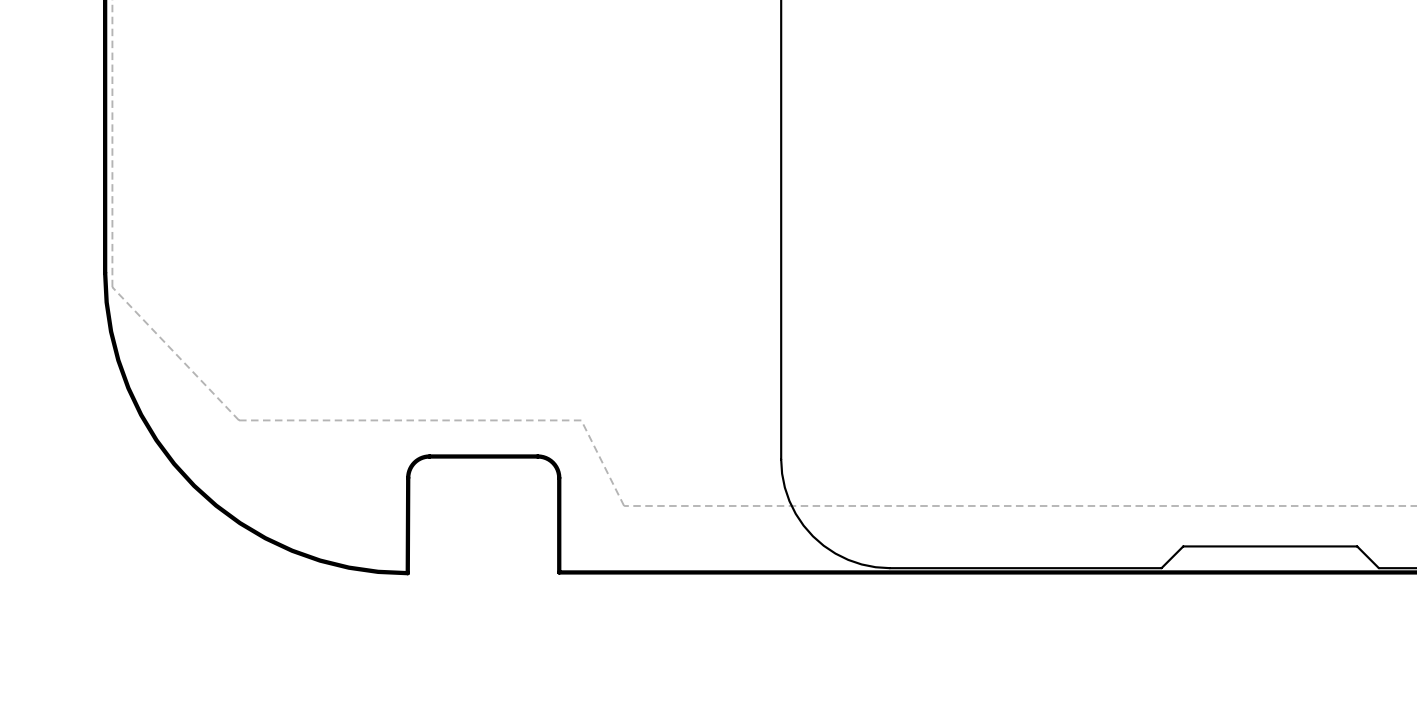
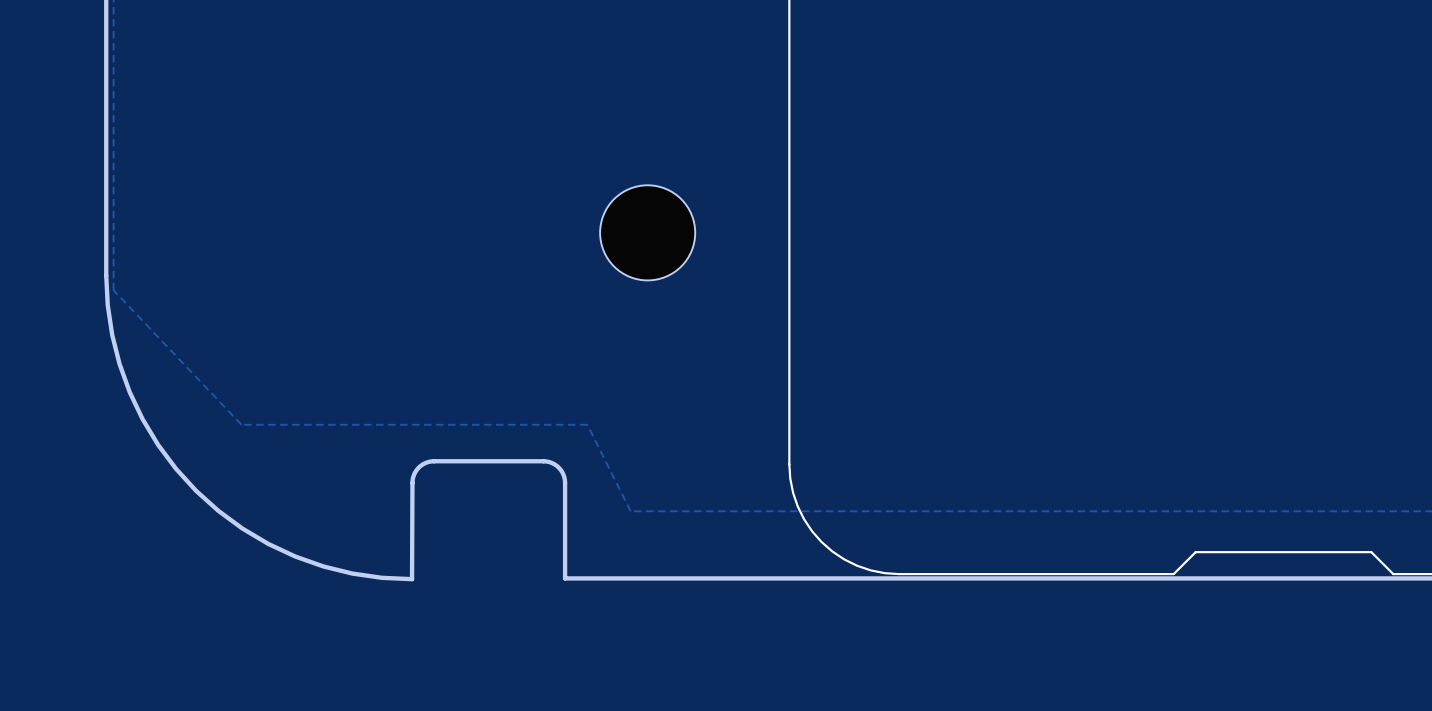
part: none -> (647, 232)

